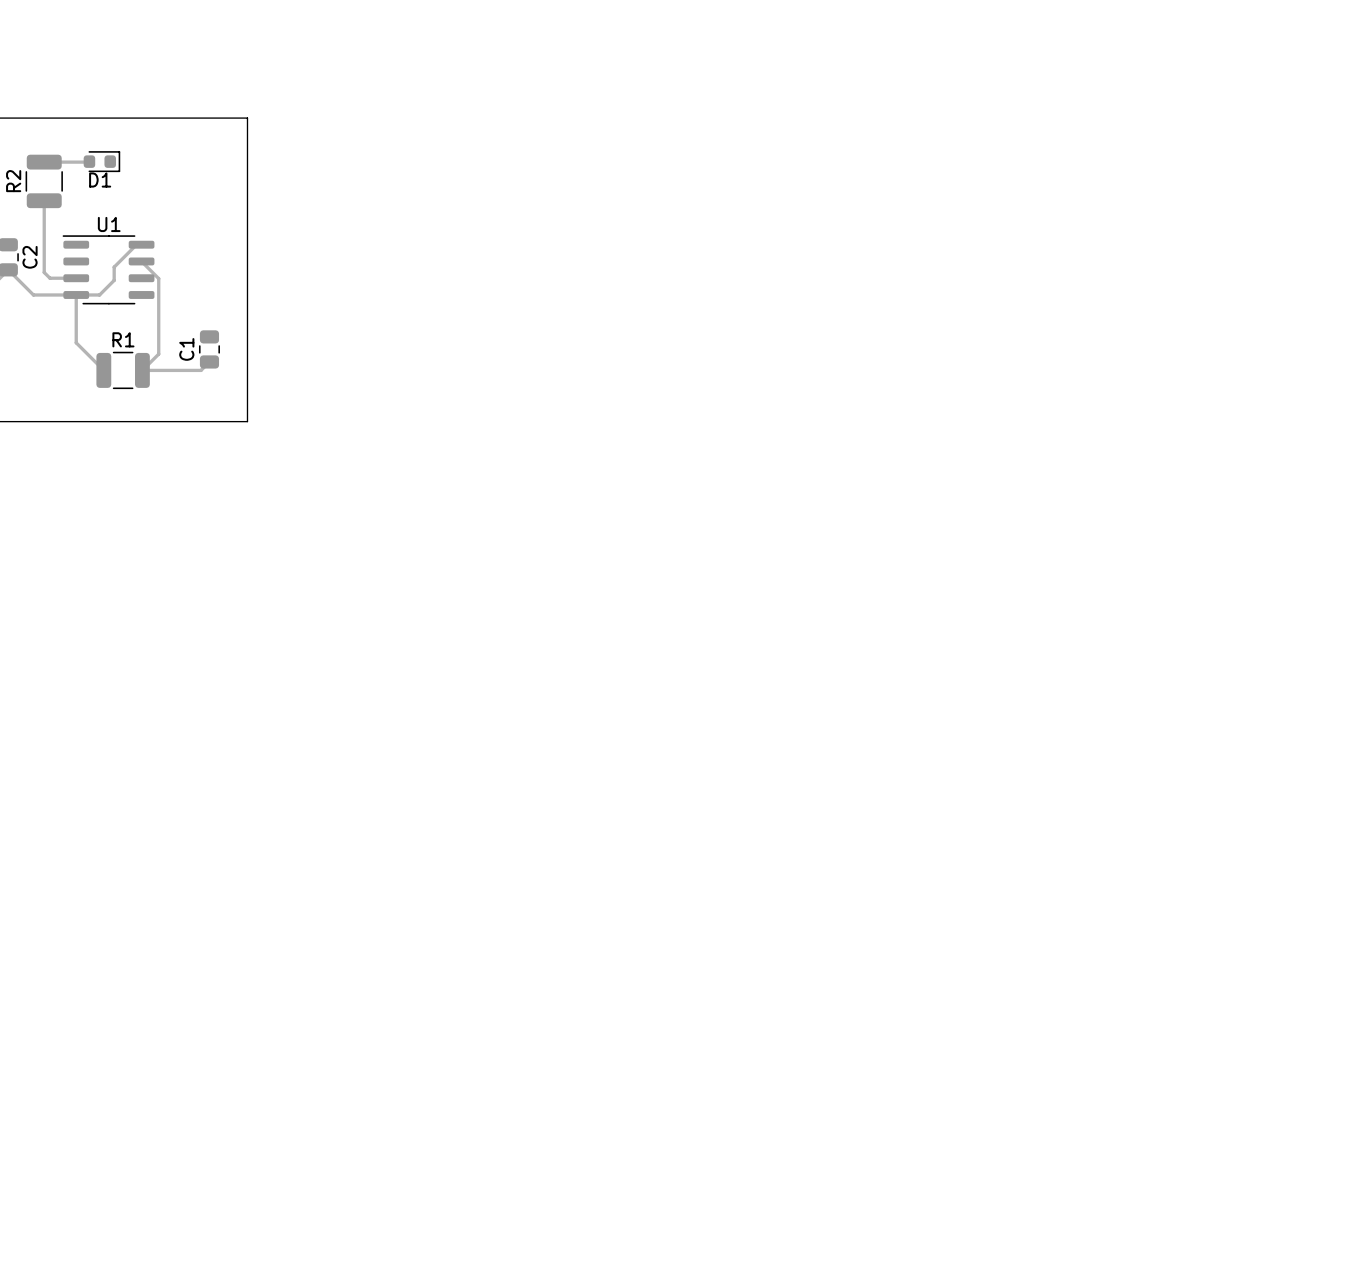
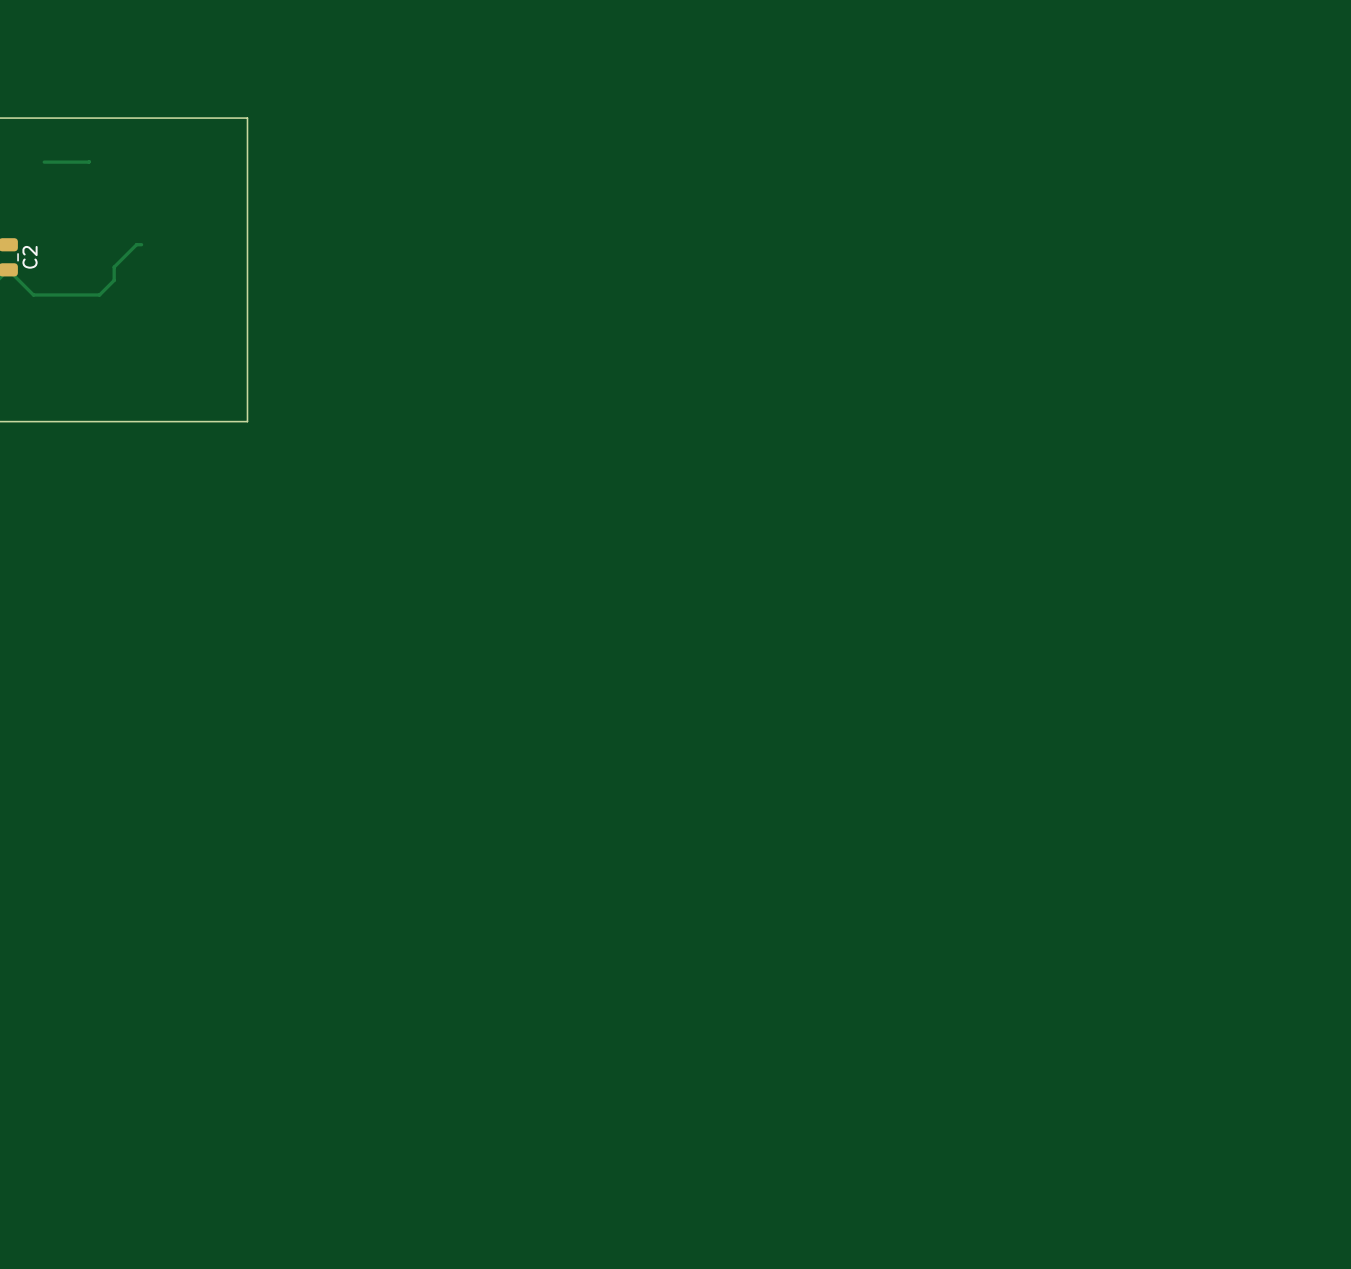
D1: (101, 161) -> none
R2: (44, 181) -> none
track: (44, 200) (44, 272) (49, 278) (76, 278) -> none
track: (141, 261) (158, 278) (158, 354) (142, 370) (201, 370) (209, 361) -> none
U1: (108, 269) -> none
track: (76, 294) (76, 342) (103, 370) -> none
C1: (209, 349) -> none
R1: (123, 370) -> none

